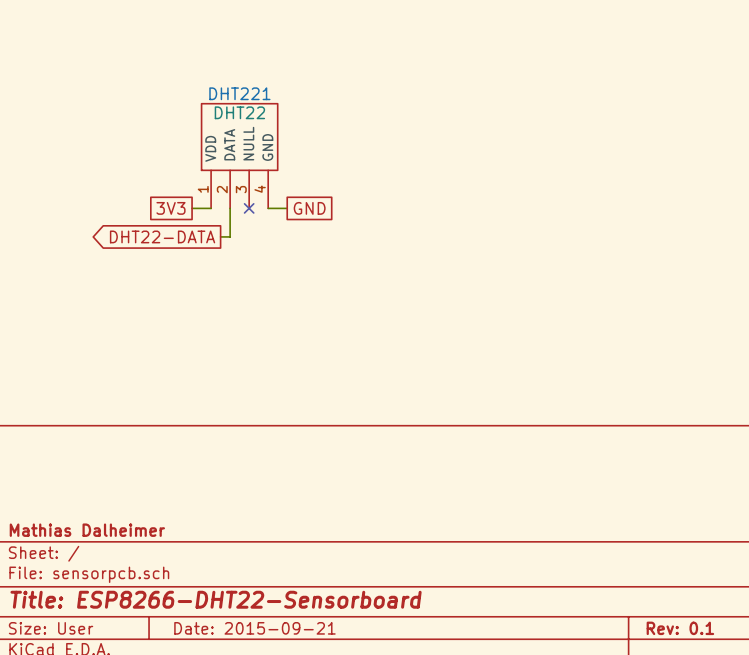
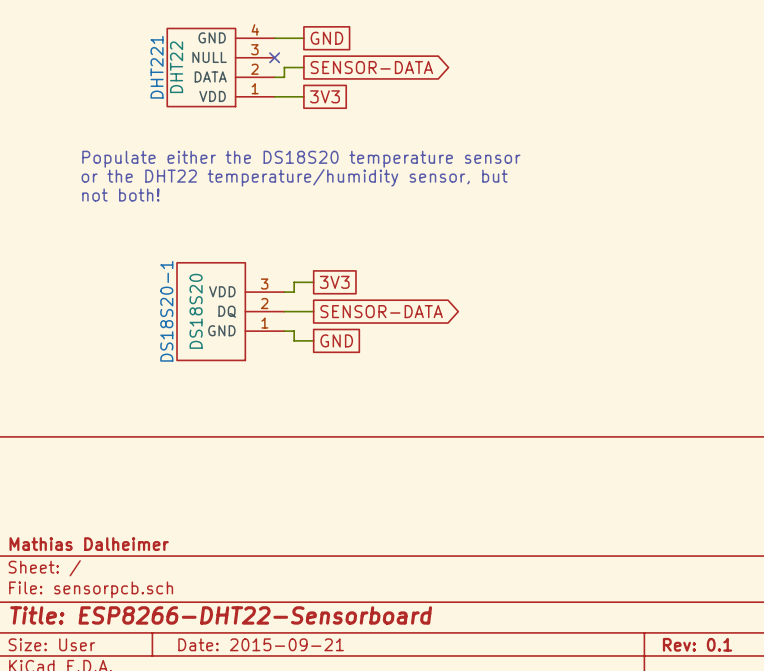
wire: none -> (274, 38) (303, 38)
global label: none -> GND (326, 38)
no-connect mark: none -> (274, 57)
wire: none -> (303, 67) (284, 67) (284, 77) (274, 77)
global label: none -> SENSOR-DATA (371, 67)
wire: none -> (274, 96) (303, 96)
global label: none -> 3V3 (324, 96)
DHT221 rotation: 0° (239, 137) -> 90° counterclockwise (201, 67)
text: none -> Populate either the DS18S20 temperature sensor (301, 159)
DHT221 position: (239, 156) -> (220, 67)
text: none -> or the DHT22 temperature/humidity sensor, but (294, 177)
text: none -> not both! (120, 195)
global label: 3V3 (170, 208) -> none
wire: (192, 208) (211, 208) -> none
wire: (230, 208) (230, 236) (220, 236) -> none
no-connect mark: (249, 208) -> none
wire: (268, 208) (287, 208) -> none
global label: GND (309, 208) -> none
global label: DHT22-DATA (162, 236) -> none
wire: none -> (313, 282) (294, 282) (294, 292) (284, 292)
global label: none -> 3V3 (334, 282)
DS18S20-1: none -> DS18S20 (230, 311)
wire: none -> (284, 311) (313, 311)
global label: none -> SENSOR-DATA (381, 311)
wire: none -> (284, 331) (294, 331) (294, 340) (313, 340)
global label: none -> GND (336, 340)

